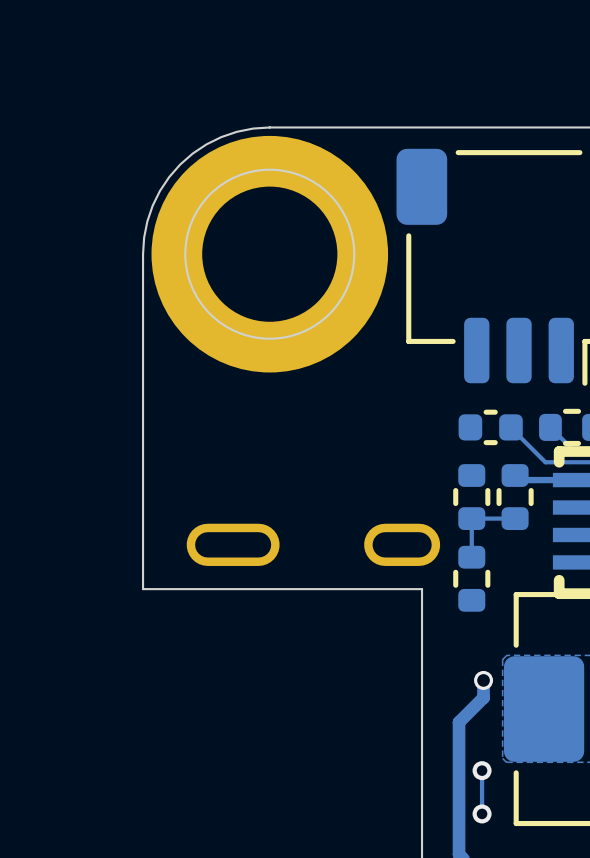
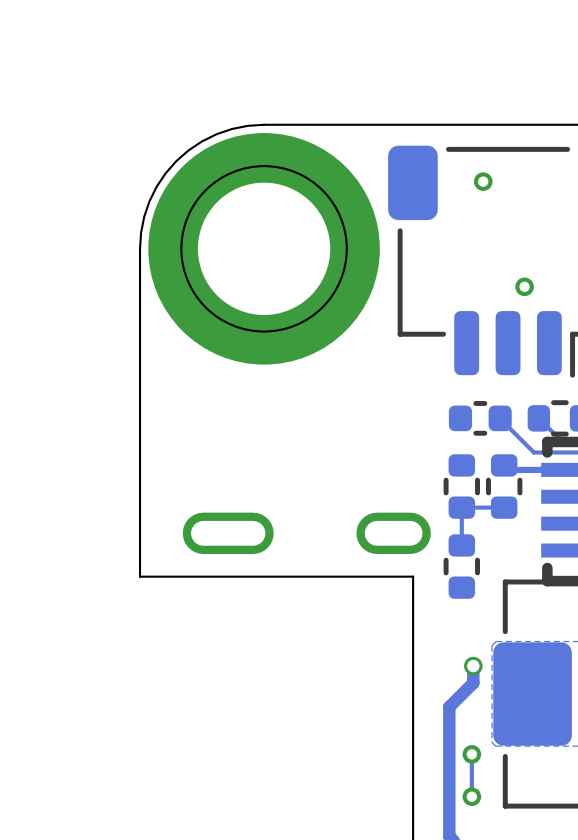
via: none -> (483, 181)
via: none -> (524, 286)

